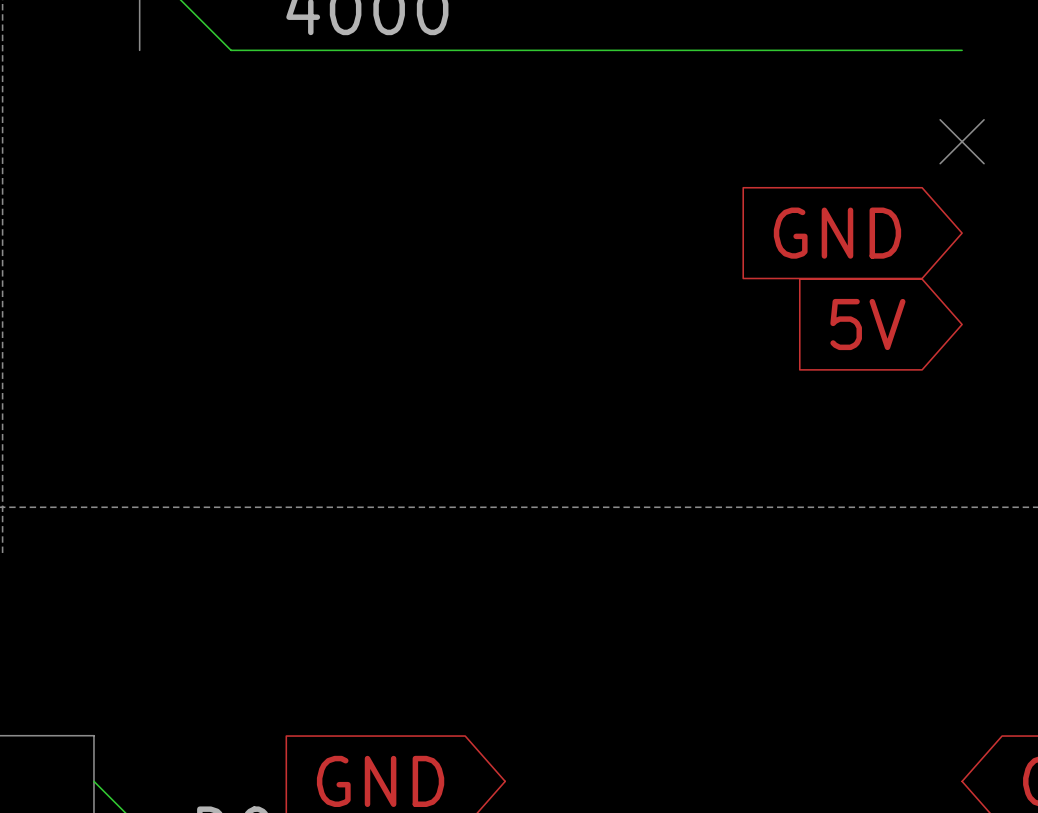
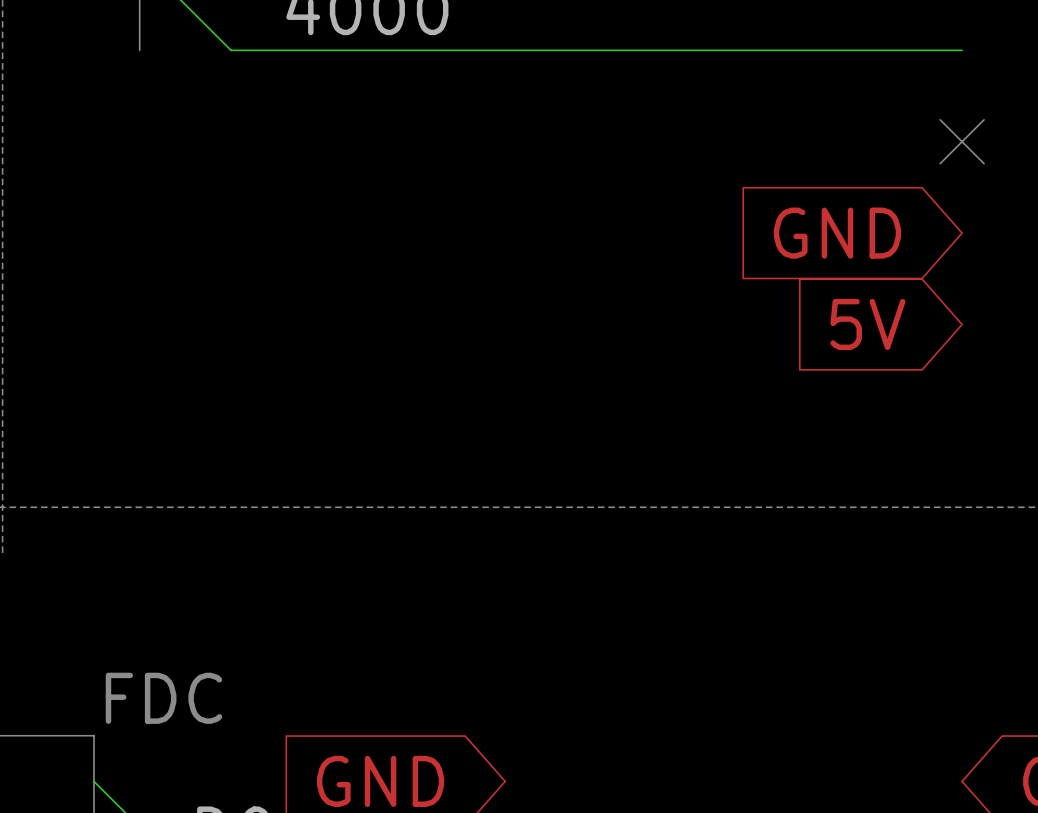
text: none -> FDC (163, 698)

